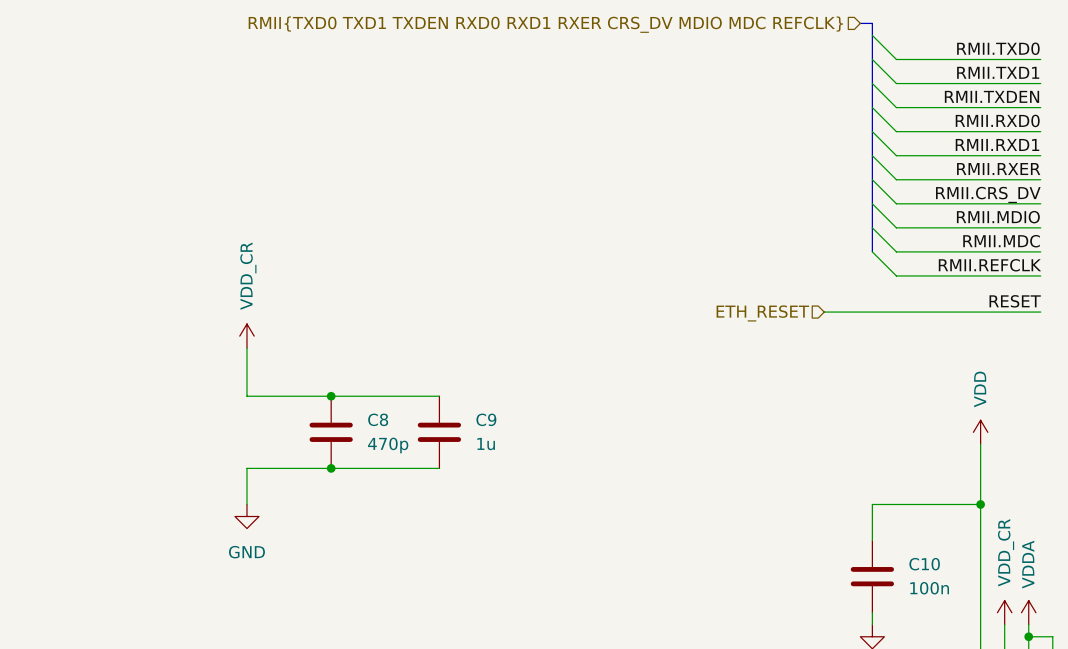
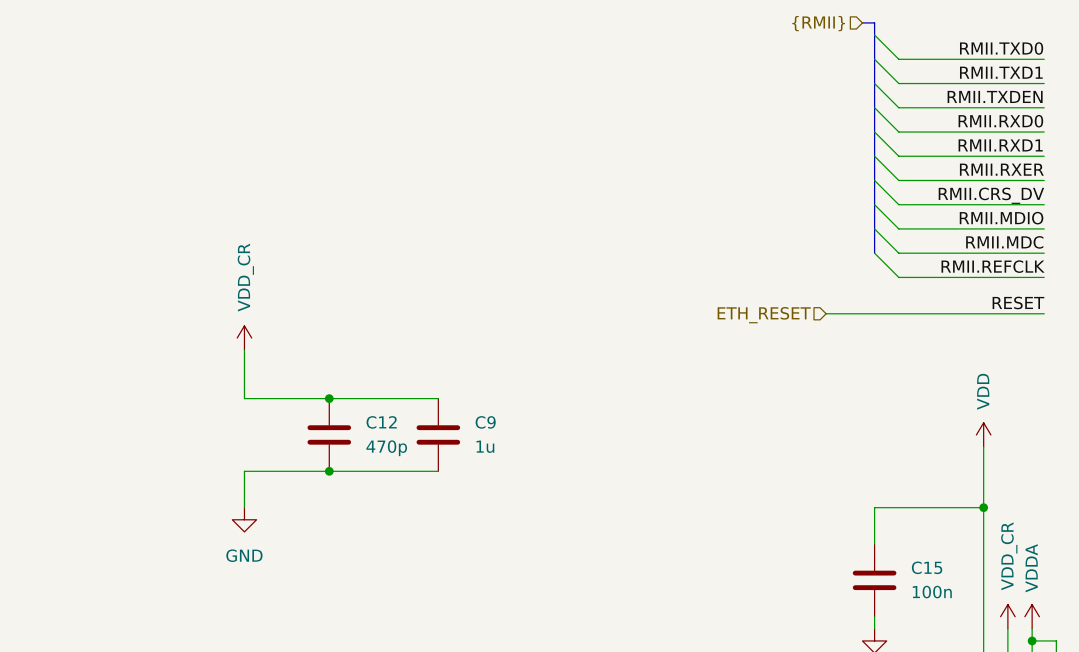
hierarchical label: RMII{TXD0 TXD1 TXDEN RXD0 RXD1 RXER CRS_DV MDIO MDC REFCLK} (545, 24) -> {RMII} (818, 23)
C8 name: C8 (378, 419) -> C12 (381, 422)
C10 name: C10 (924, 564) -> C15 (927, 567)

